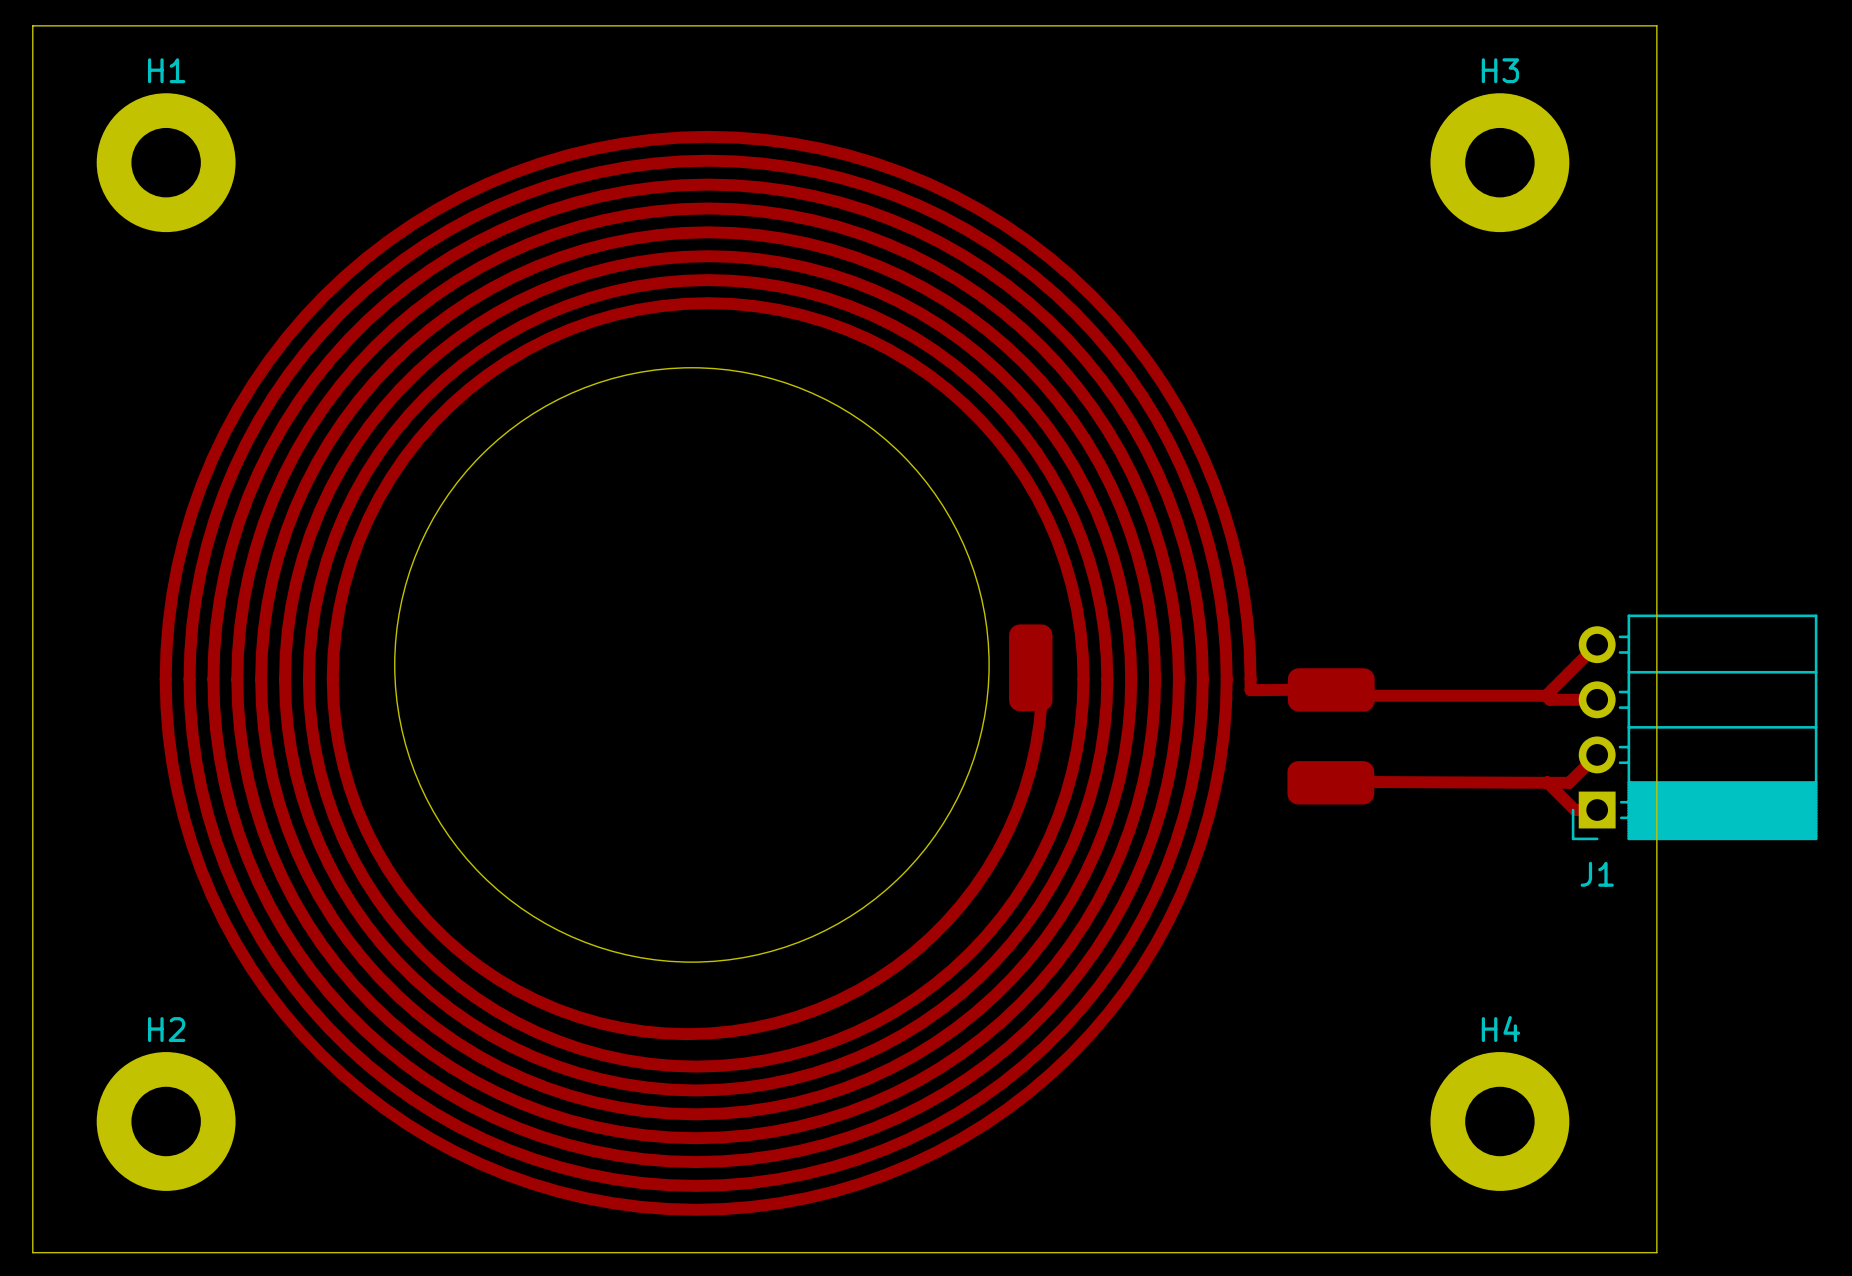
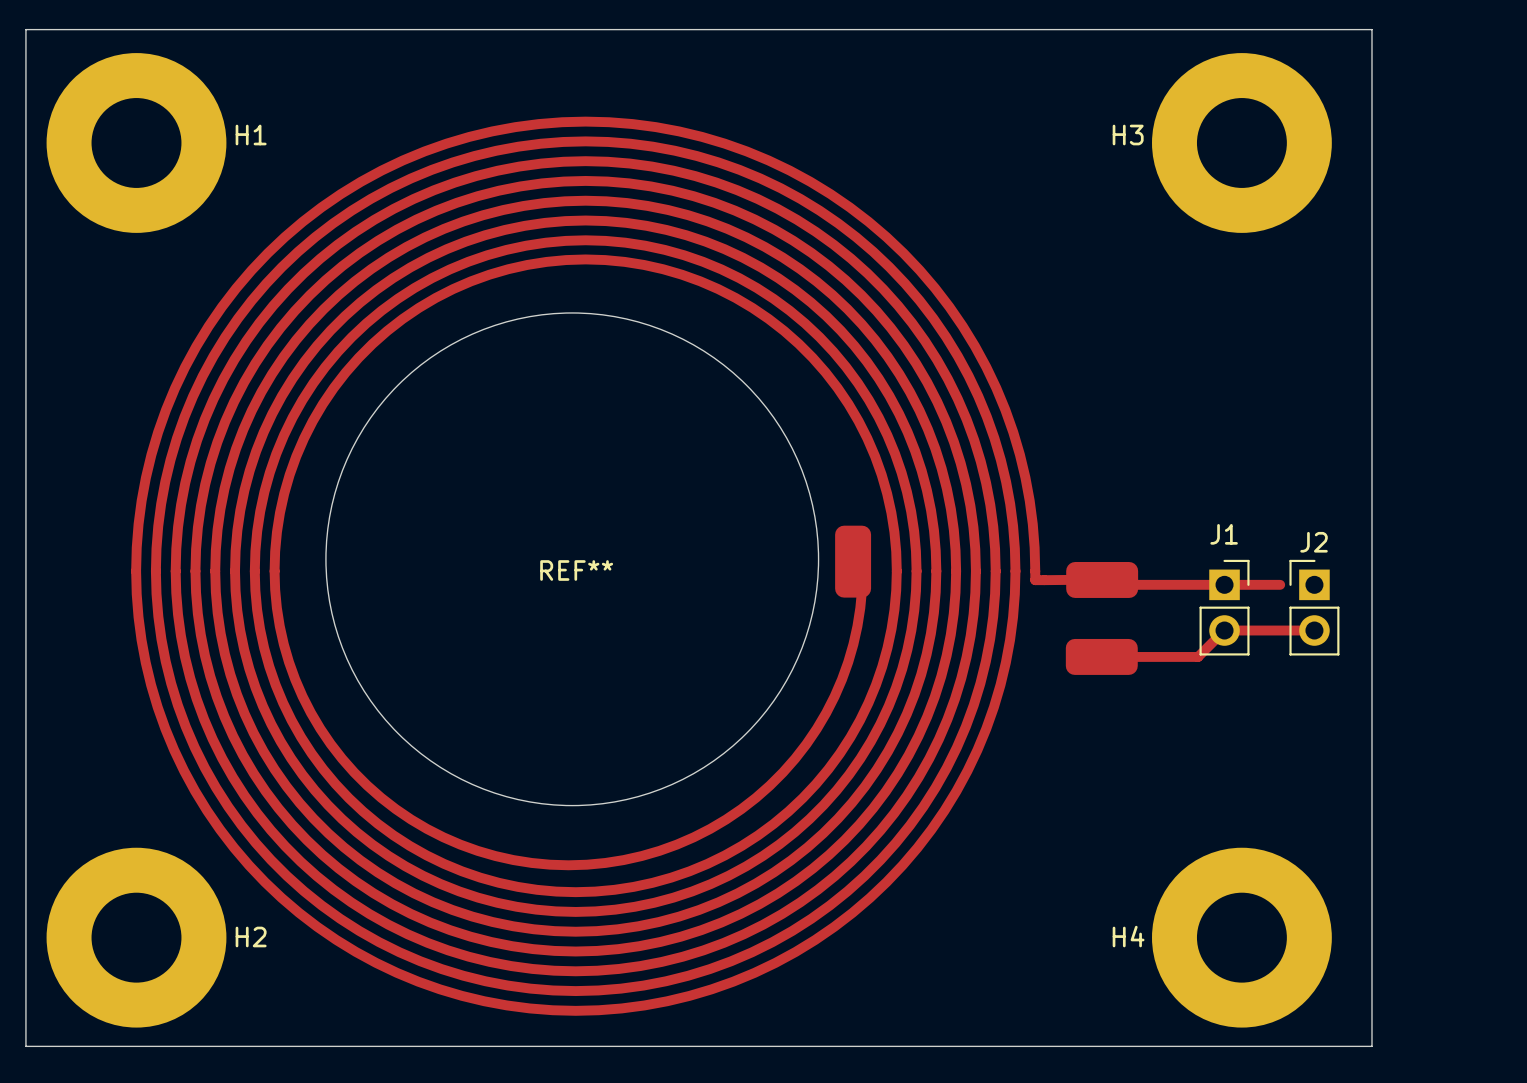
H1 name position: H1 (166, 70) -> H1 (251, 135)
H3 name position: H3 (1500, 70) -> H3 (1128, 135)
H1 footprint: [96, 93, 236, 233] -> [46, 53, 227, 233]
H3 footprint: [1430, 93, 1570, 233] -> [1152, 53, 1332, 233]
J1 footprint: [1571, 614, 1818, 841] -> [1199, 559, 1250, 656]
track: (1597, 644) (1546, 695) (1550, 699) (1597, 699) -> none
REF** name: none -> REF** (576, 570)
J2: none -> (1314, 607)
track: (1597, 754) (1569, 782) (1546, 782) -> none
track: (1330, 782) (1546, 782) -> (1101, 656) (1198, 656) (1224, 630) (1314, 630)
track: (1546, 782) (1574, 810) (1597, 810) -> none
J1 name position: J1 (1597, 874) -> J1 (1224, 534)
H2 name position: H2 (166, 1029) -> H2 (251, 936)
H4 name position: H4 (1500, 1029) -> H4 (1128, 936)
H2 footprint: [96, 1052, 236, 1191] -> [46, 847, 227, 1028]
H4 footprint: [1430, 1052, 1570, 1191] -> [1152, 847, 1332, 1028]

